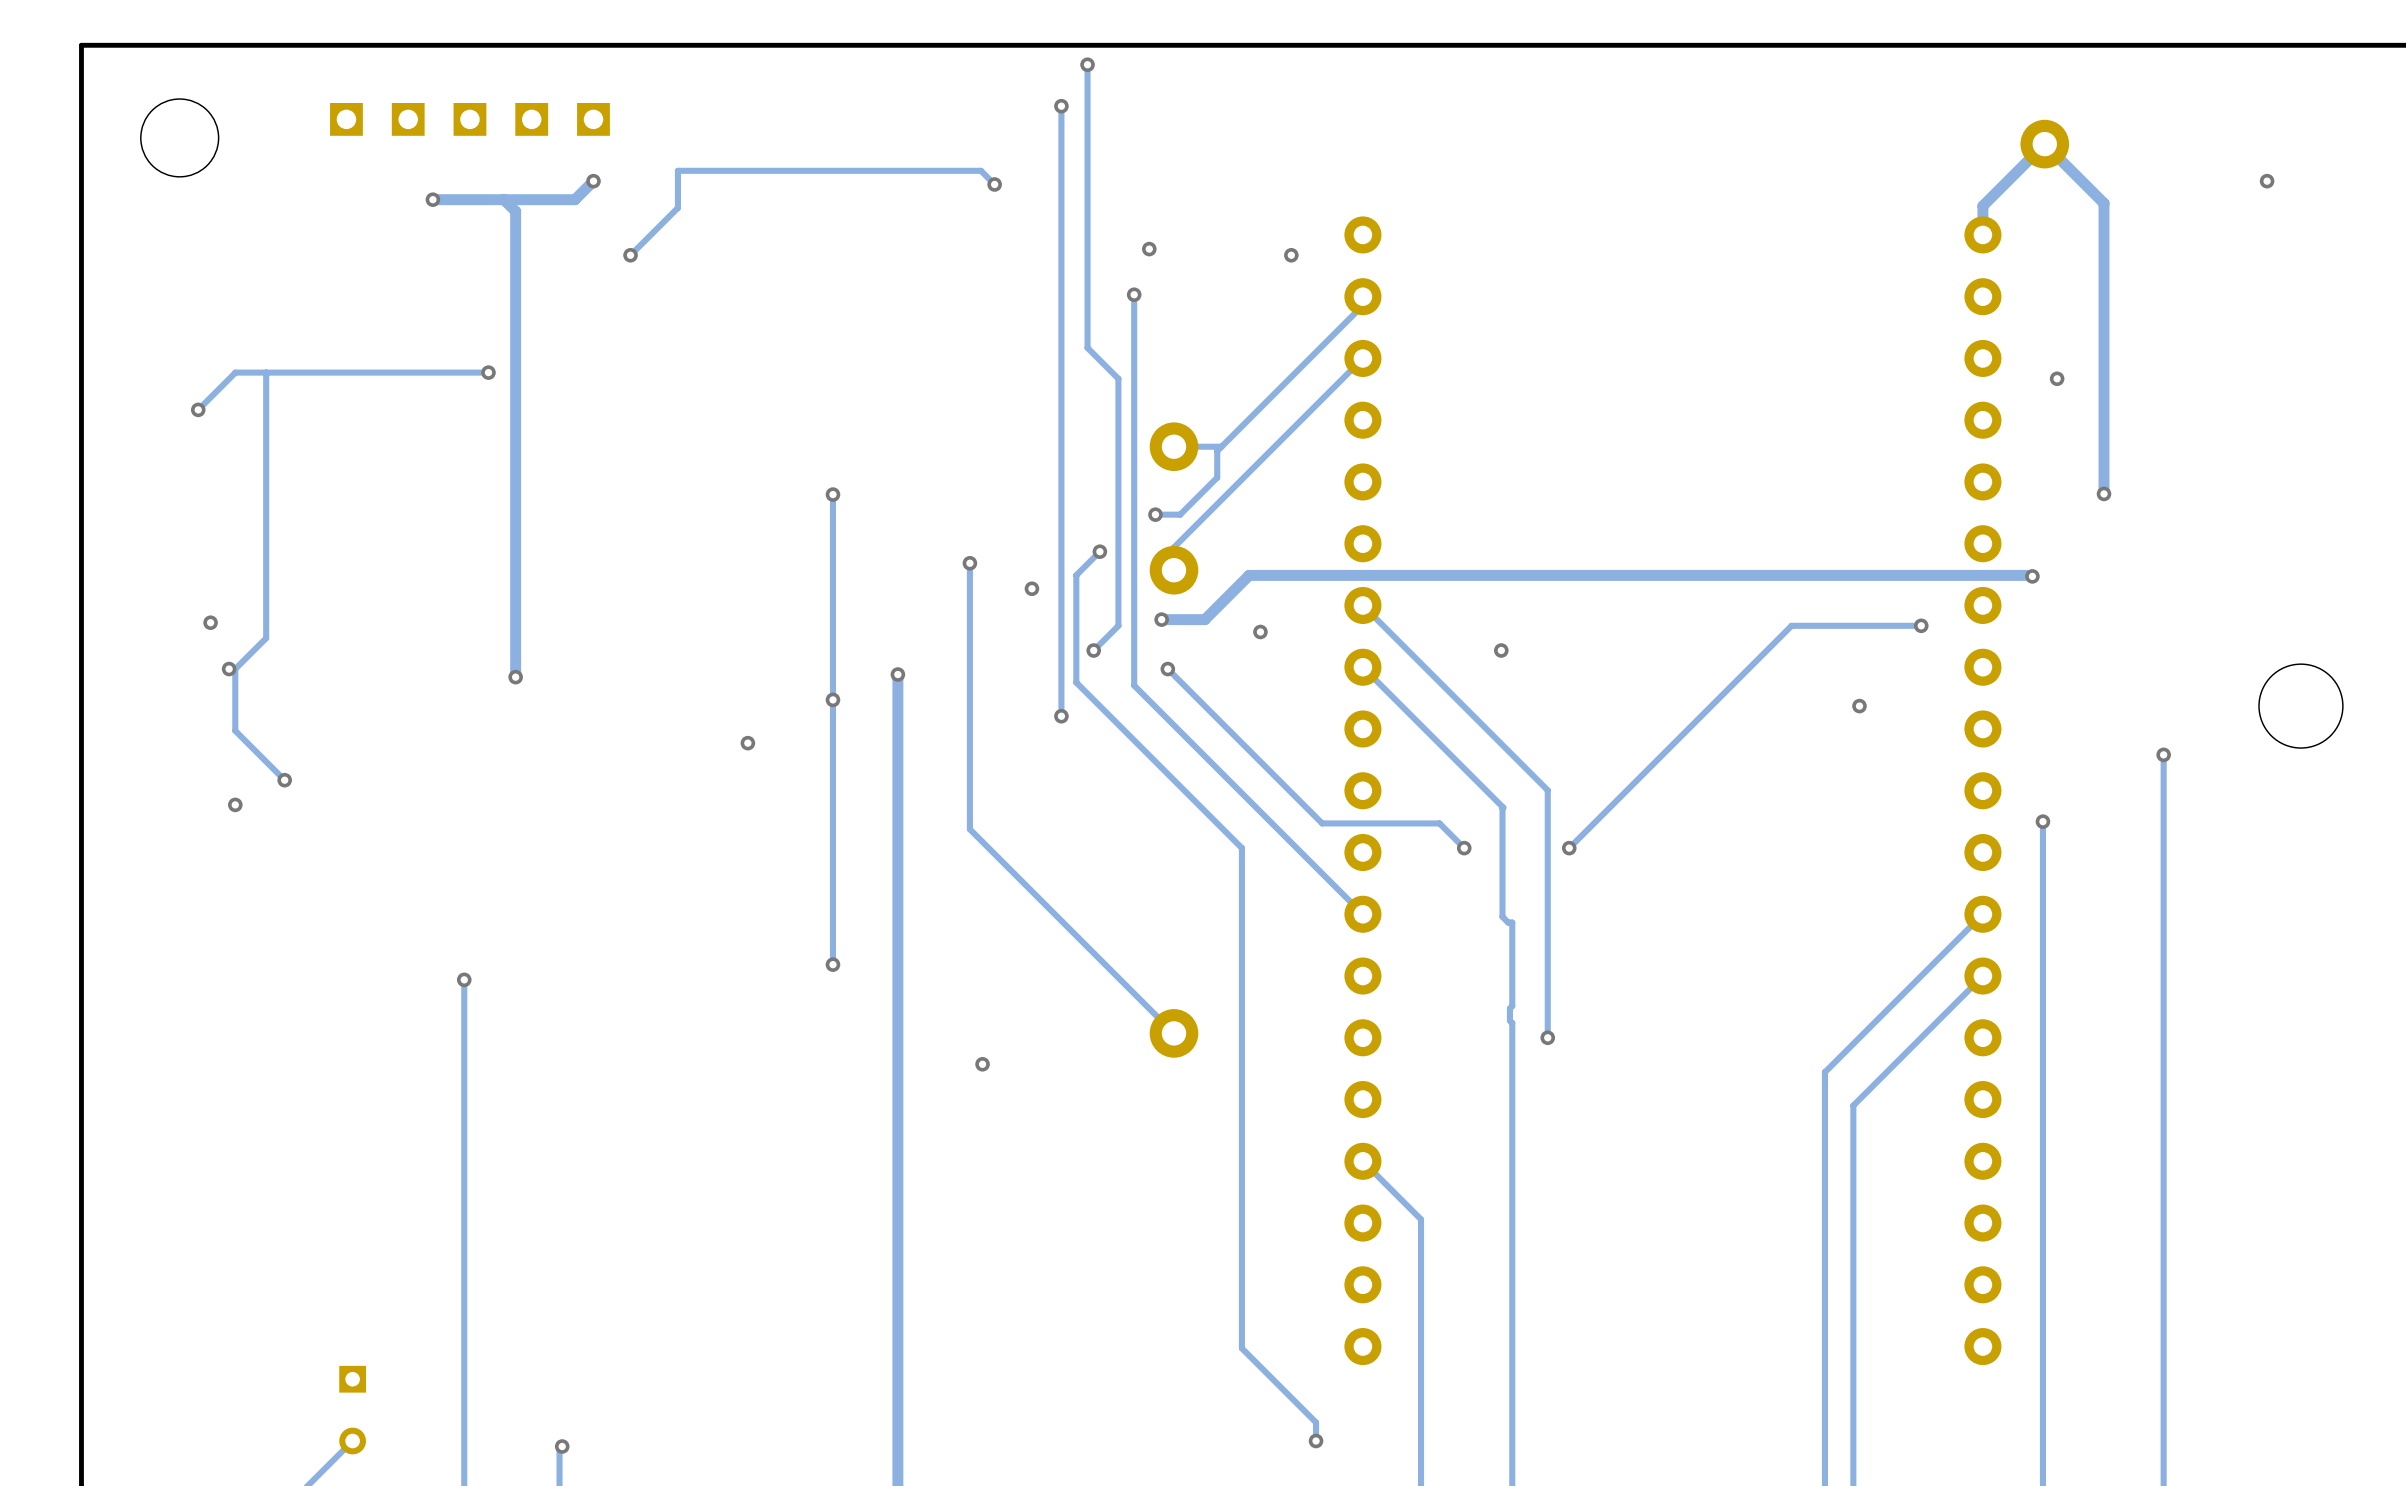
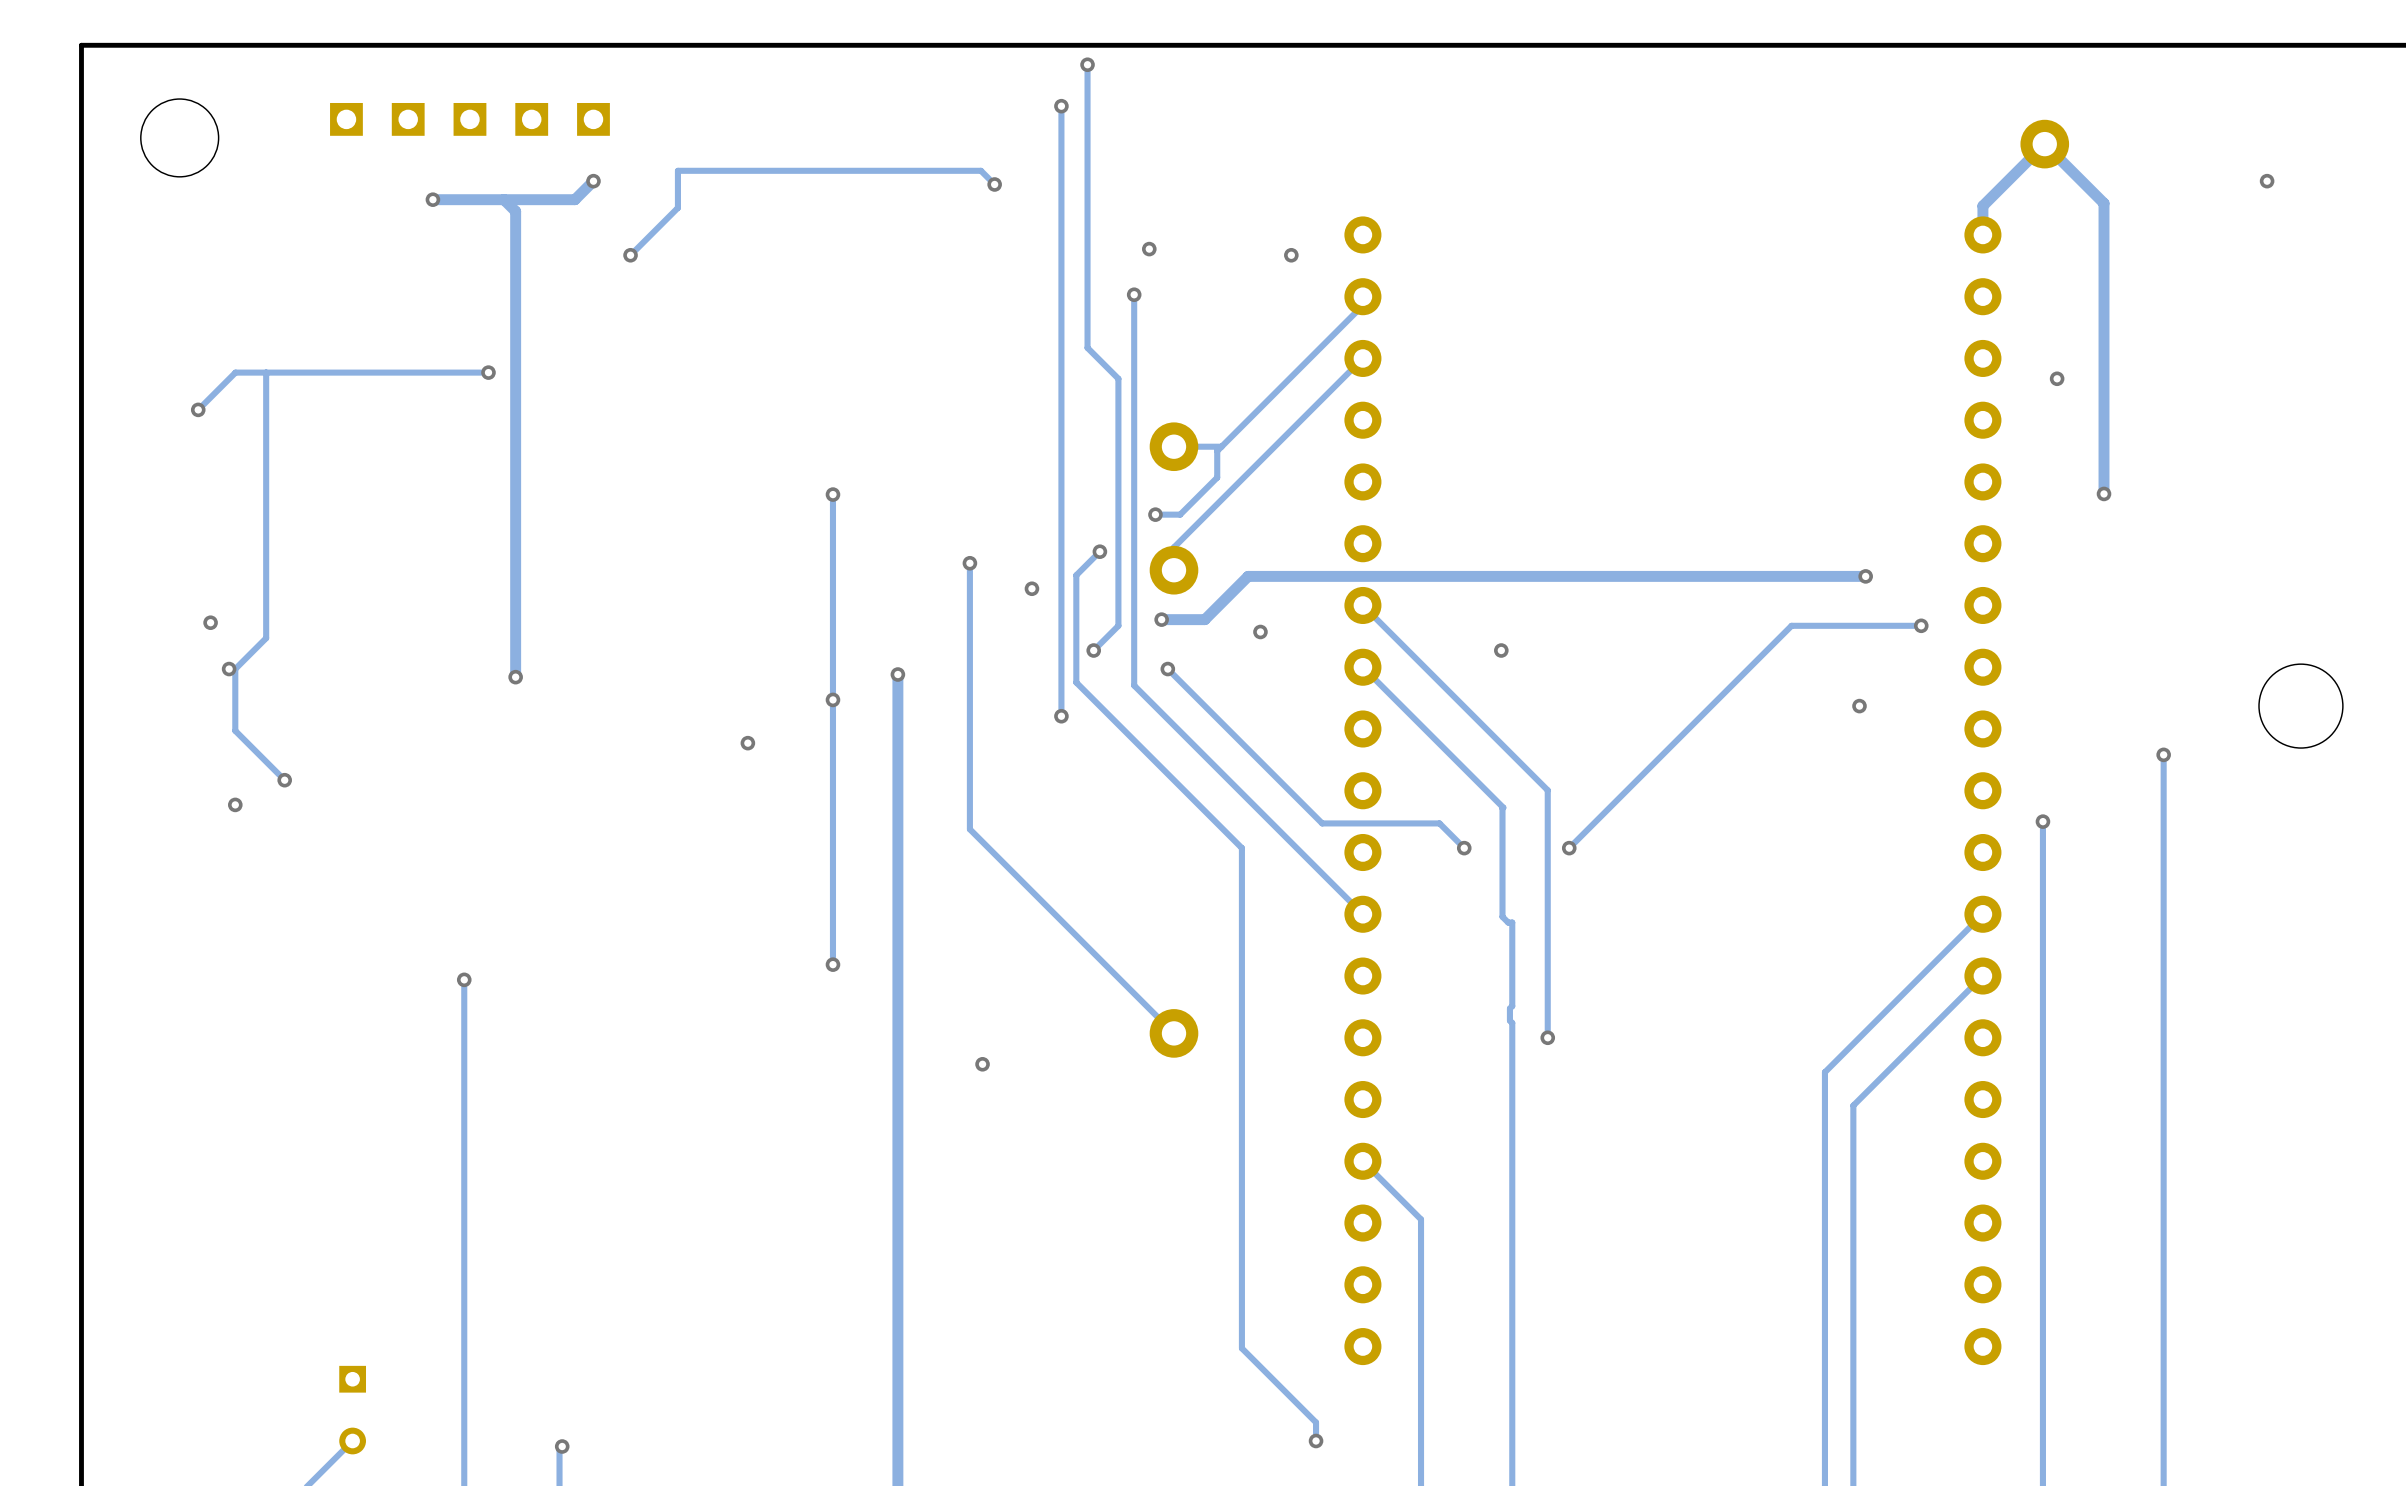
via: none -> (1865, 576)
track: (2032, 576) (1248, 576) -> (1865, 576) (1248, 576)
via: (2032, 576) -> none

